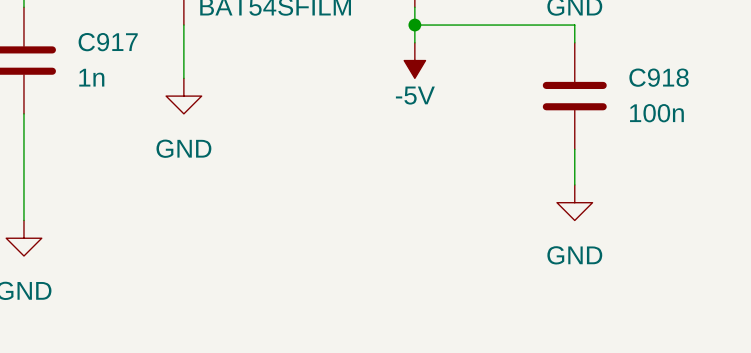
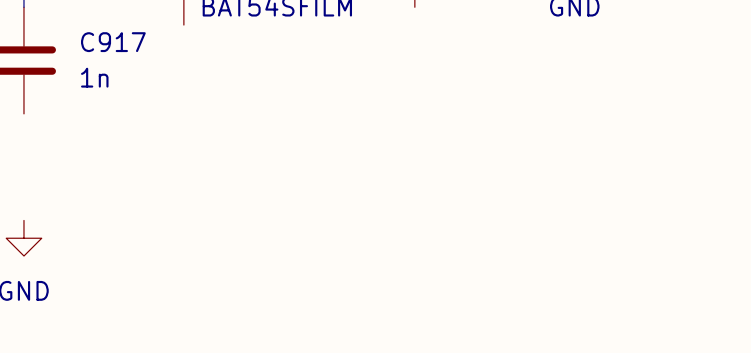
wire: (414, 7) (414, 42) -> none
wire: (183, 25) (183, 78) -> none
wire: (414, 25) (574, 25) (574, 42) -> none
junction: (414, 25) -> none
power symbol: -5V (414, 60) -> none
power symbol: GND (183, 96) -> none
C918: 100n (574, 96) -> none
wire: (23, 113) (23, 220) -> none
wire: (574, 149) (574, 184) -> none
power symbol: GND (574, 202) -> none

